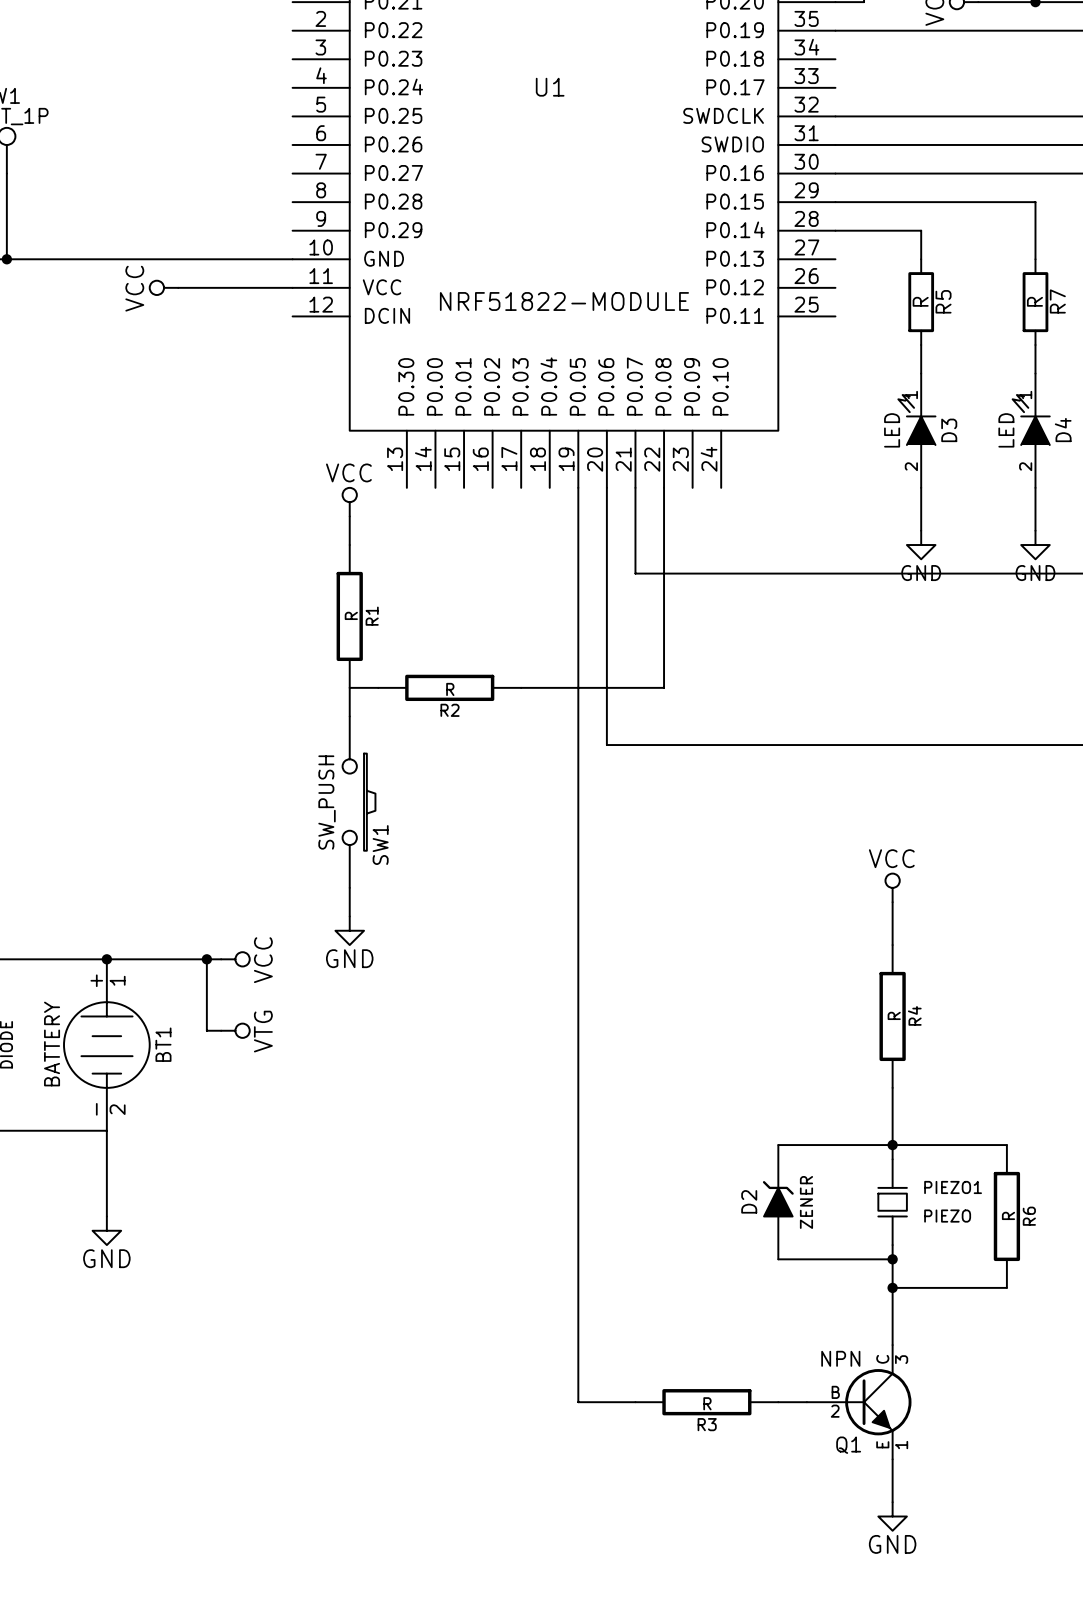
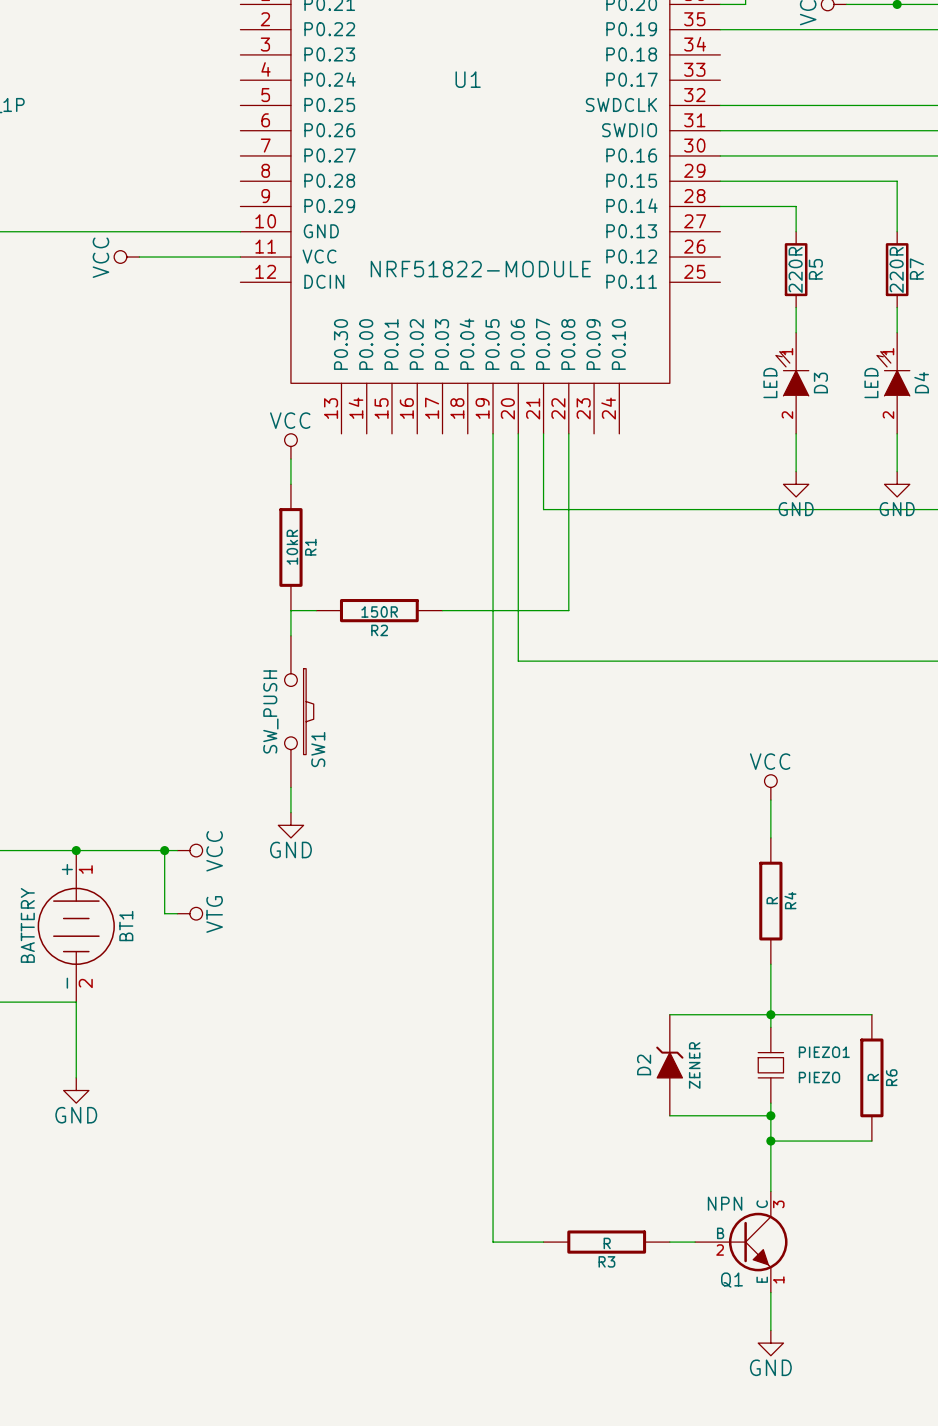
R5 value: R (920, 301) -> 220R (795, 269)
R7 value: R (1034, 301) -> 220R (896, 269)
R1 value: R (351, 615) -> 10kR (292, 547)
R2 value: R (450, 689) -> 150R (379, 612)

